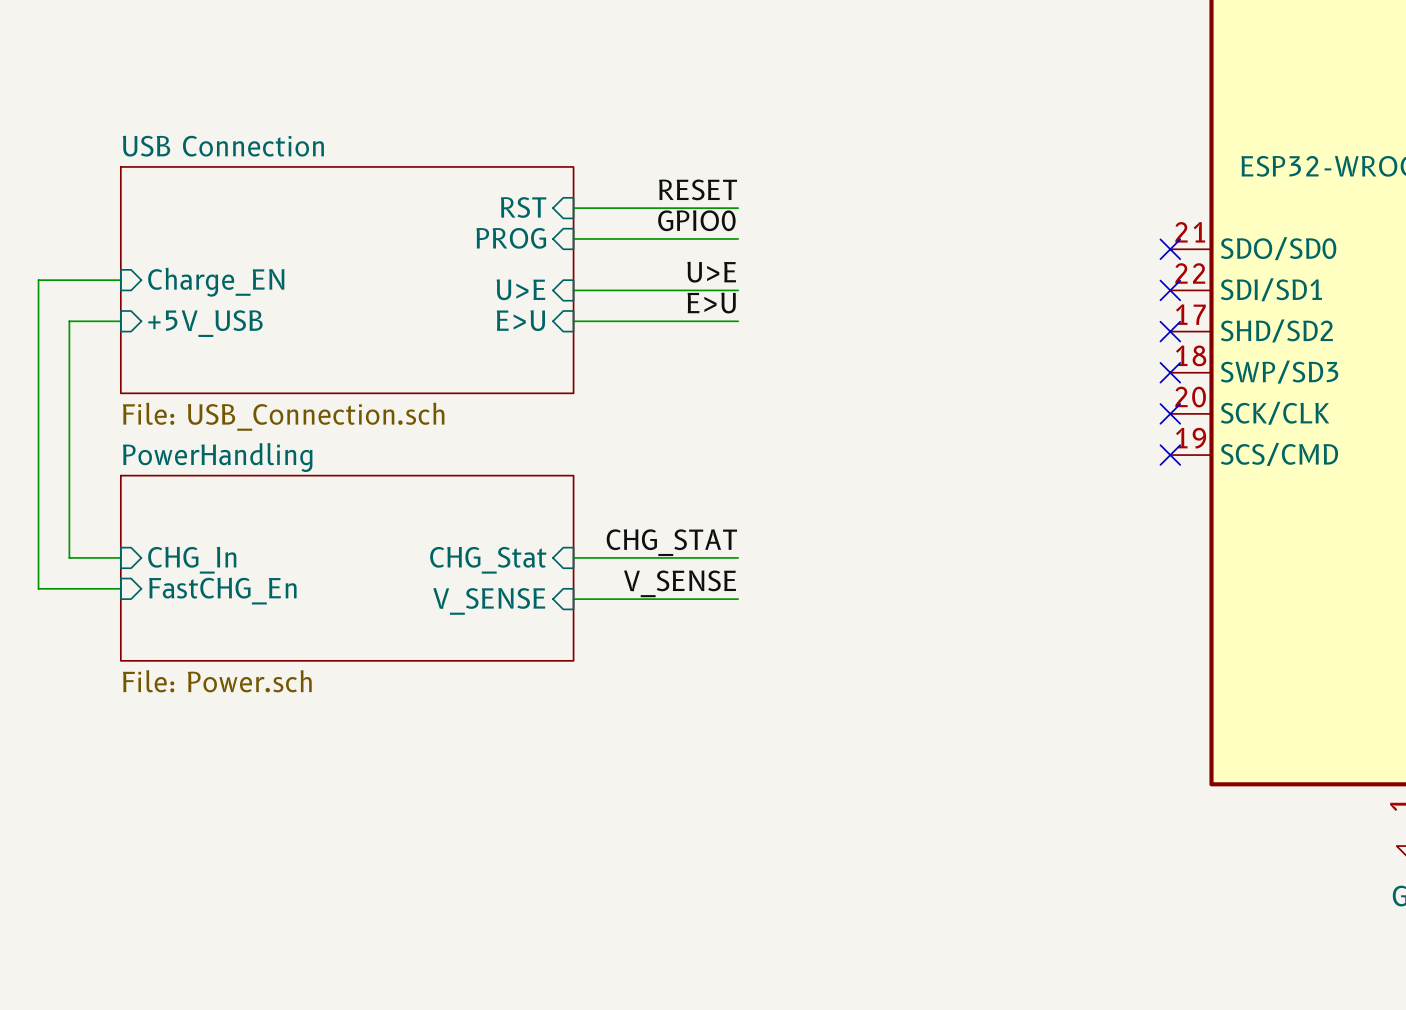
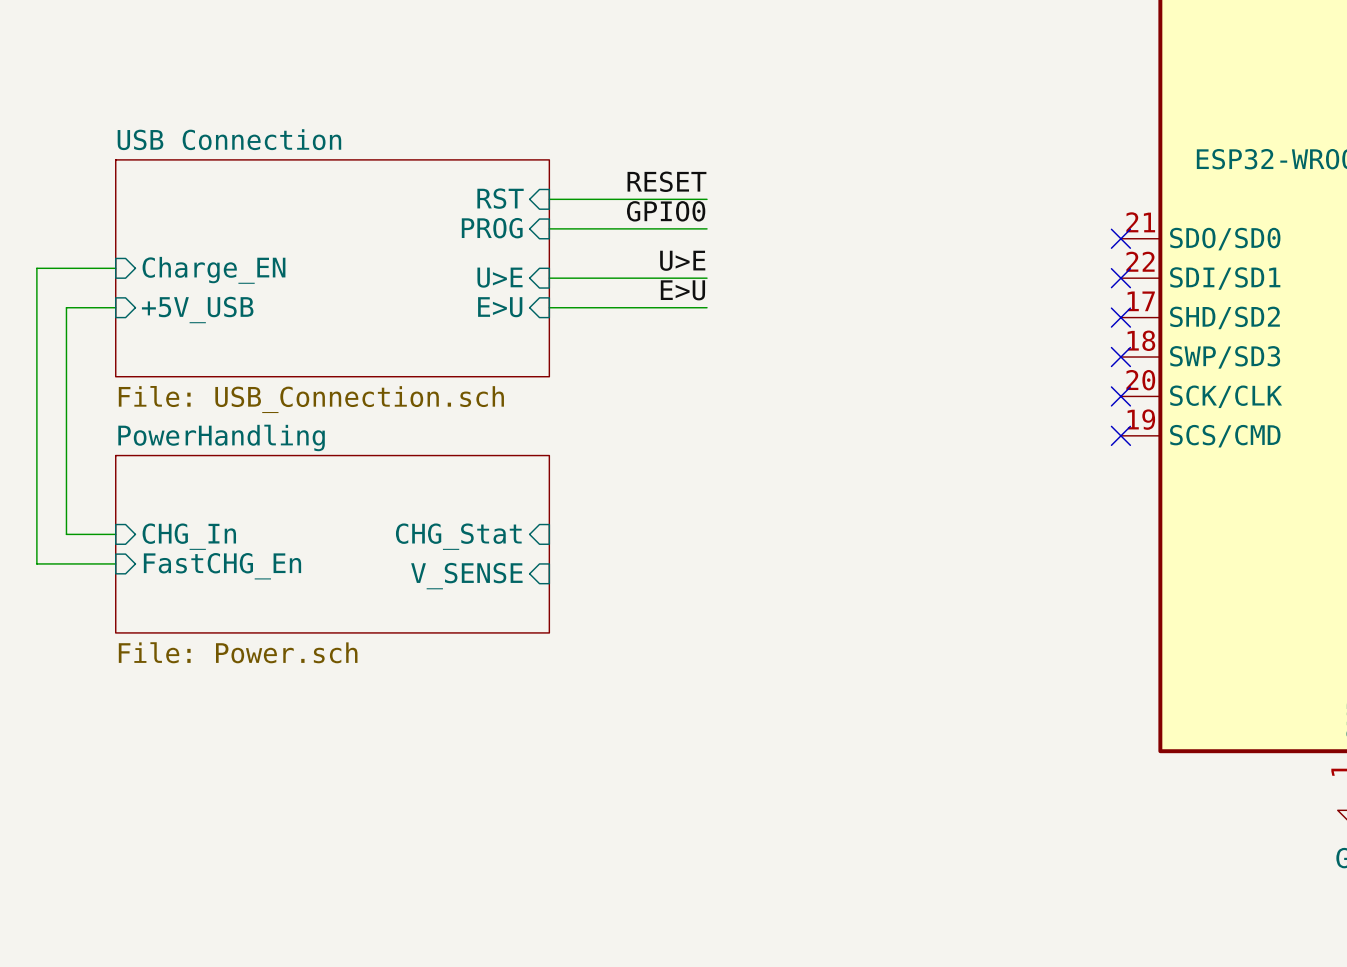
label: CHG_STAT (671, 542) -> none
wire: (573, 557) (738, 557) -> none
label: V_SENSE (680, 583) -> none
wire: (573, 599) (738, 599) -> none

